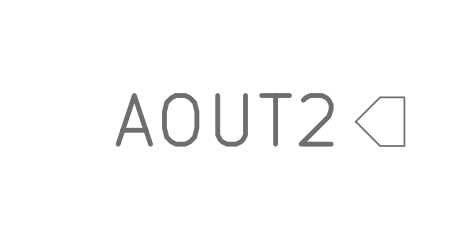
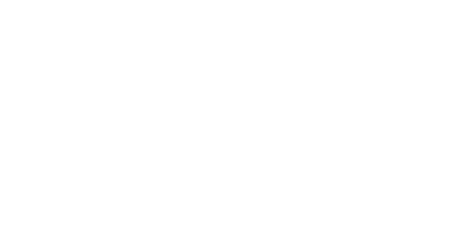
hierarchical label: AOUT2 (224, 119) -> none

